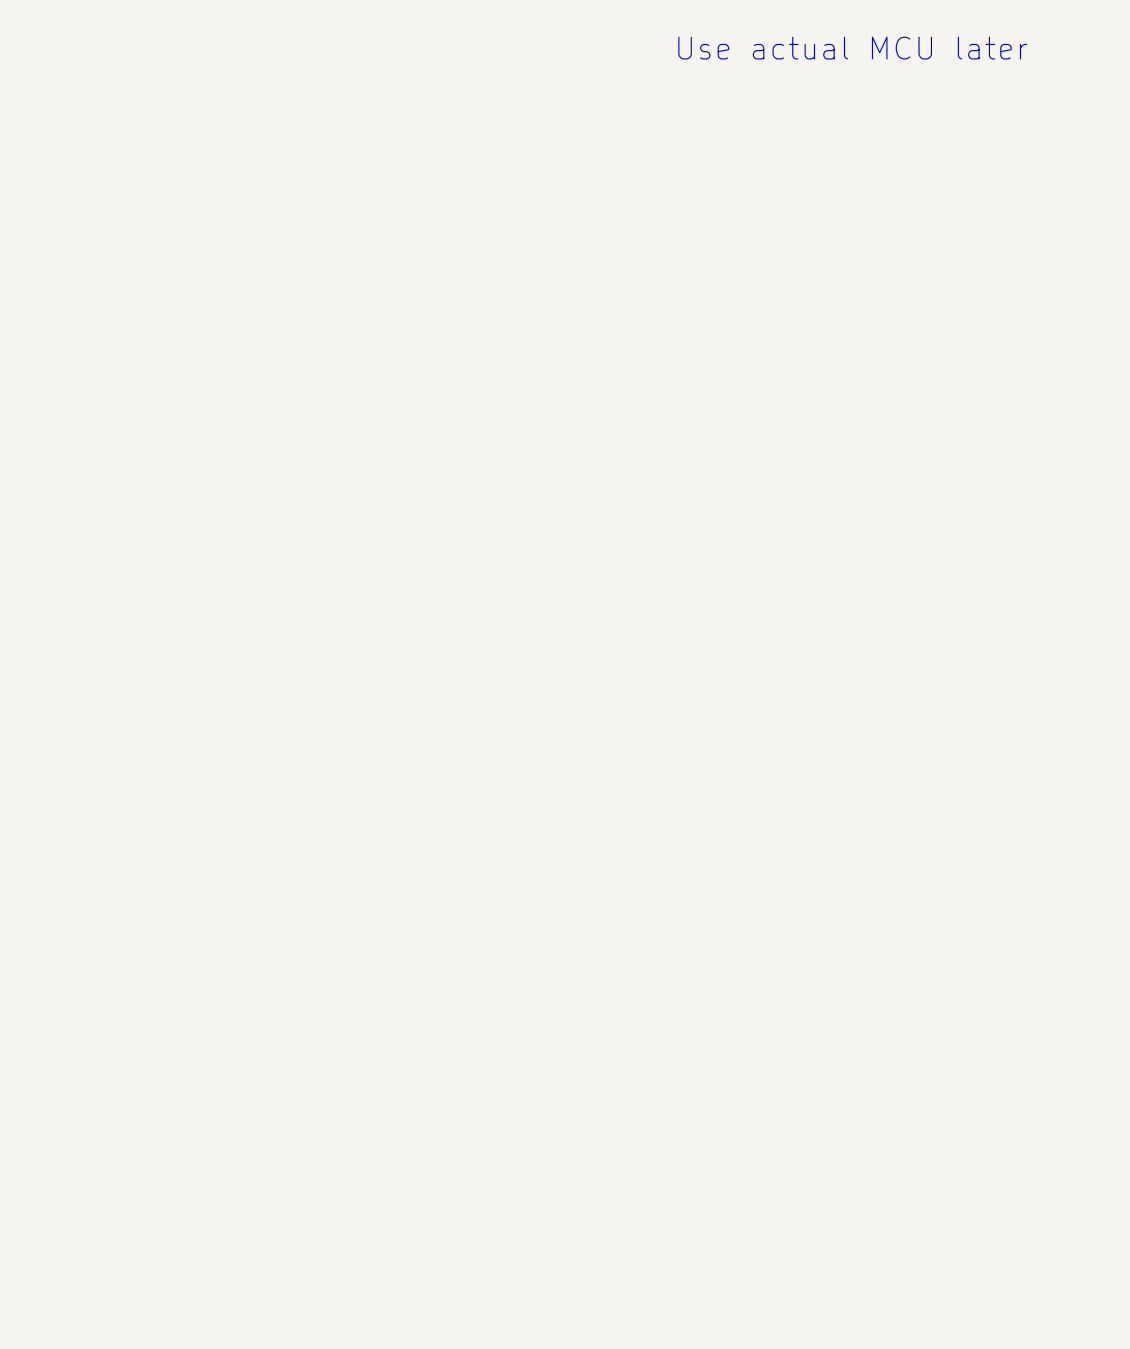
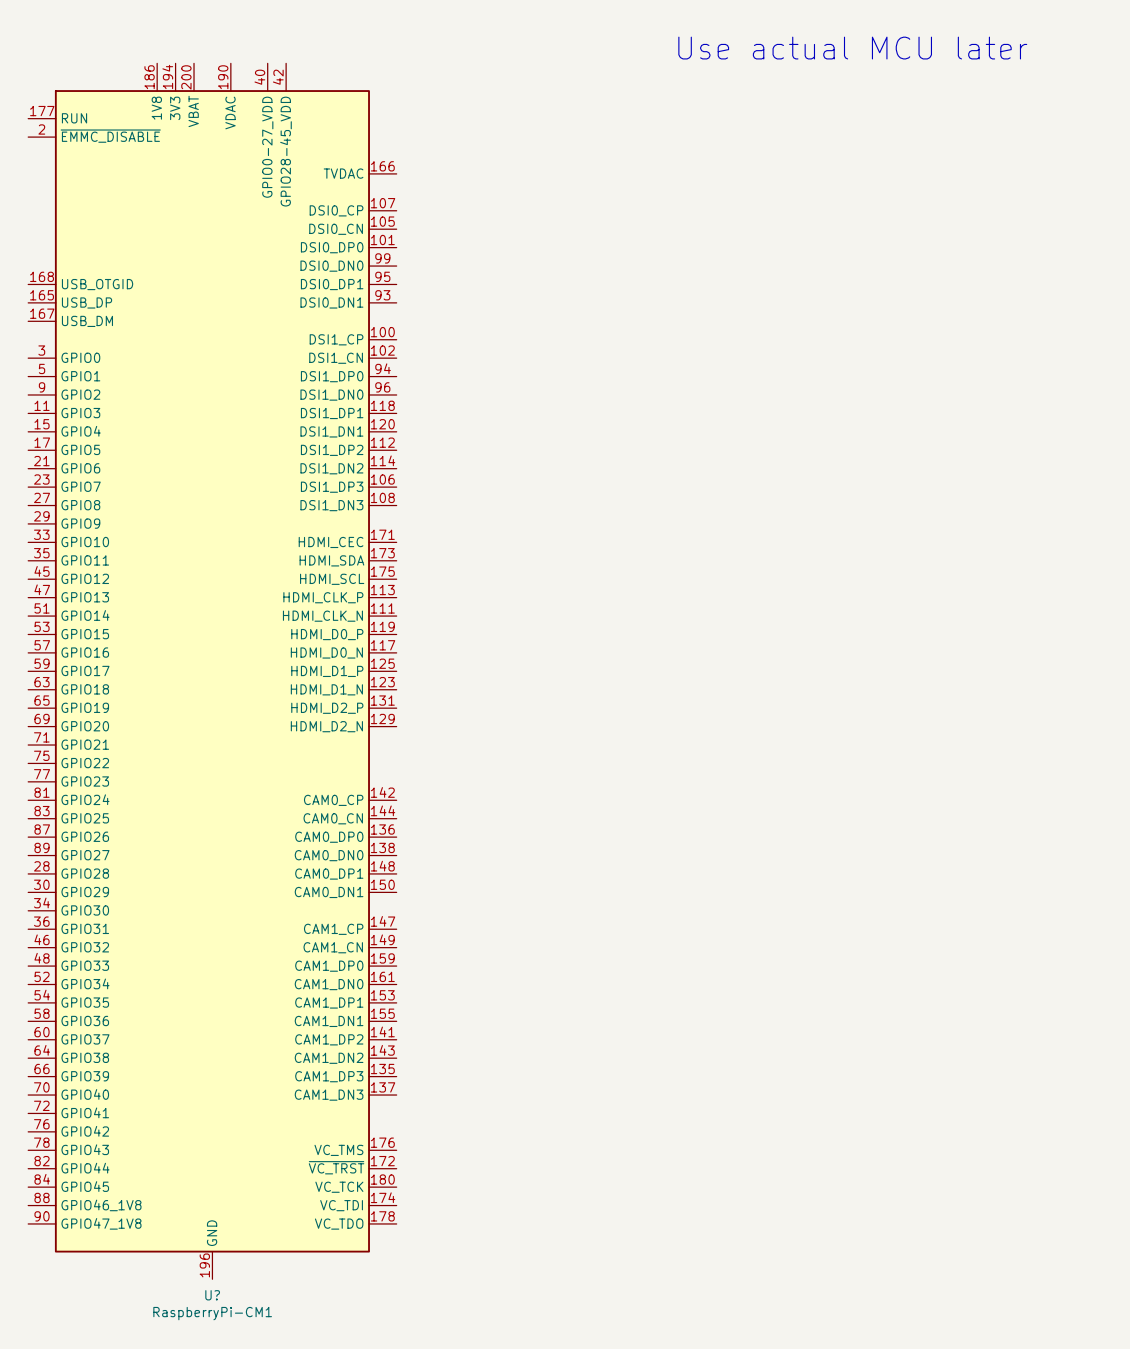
U?: none -> RaspberryPi-CM1 (212, 671)

